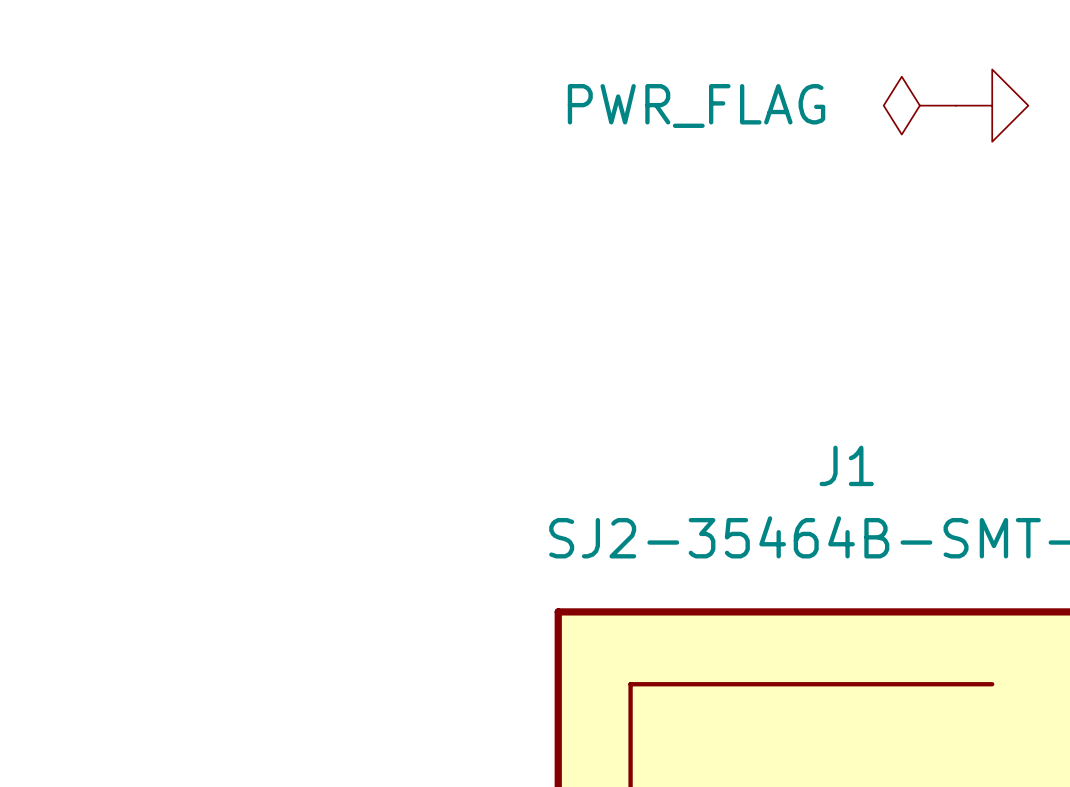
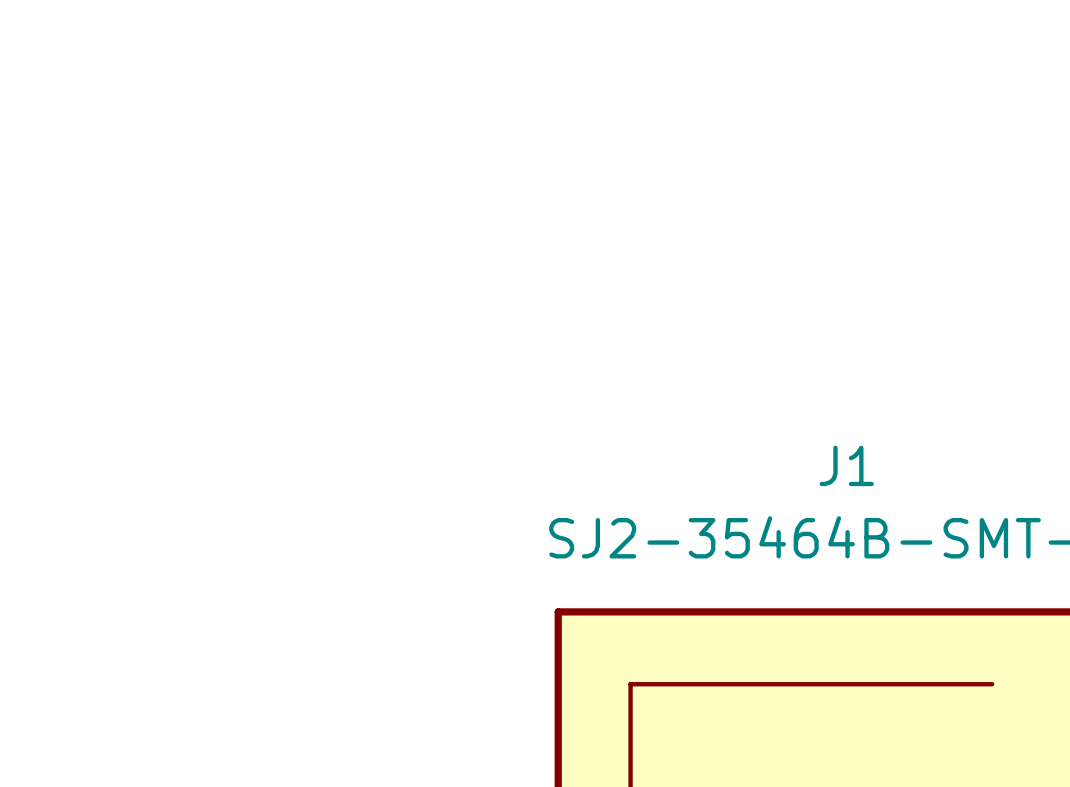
power symbol: PWR_FLAG (919, 105) -> none
power symbol: (992, 105) -> none

